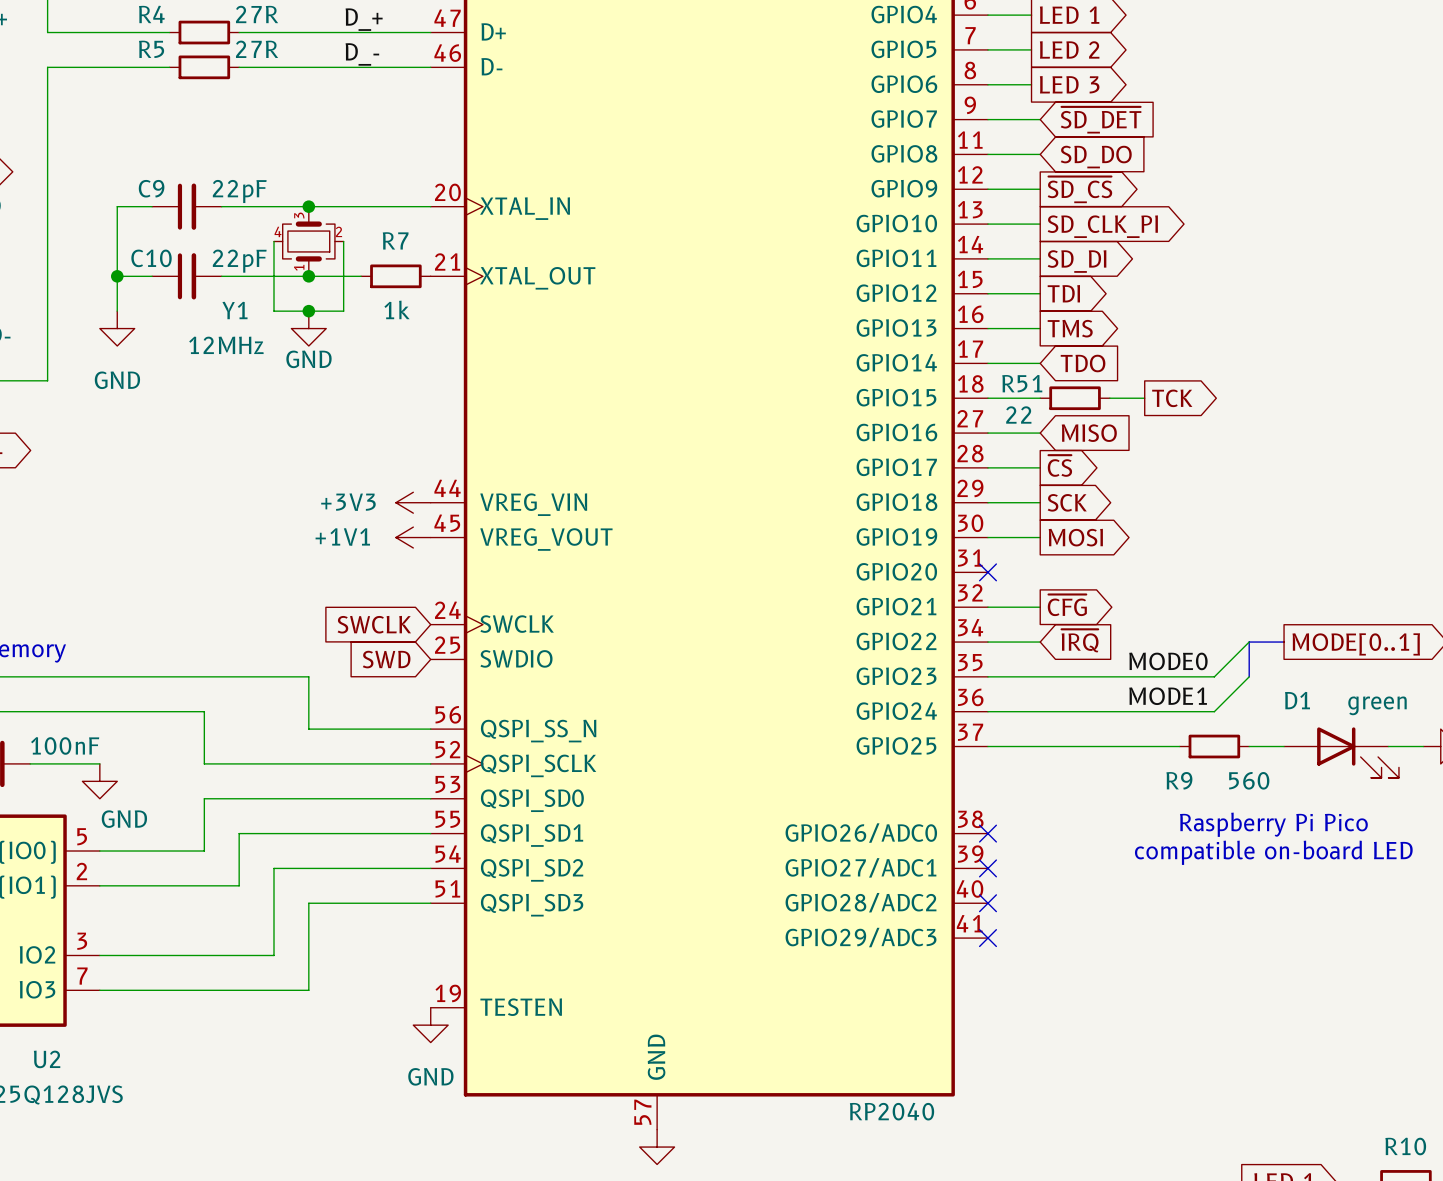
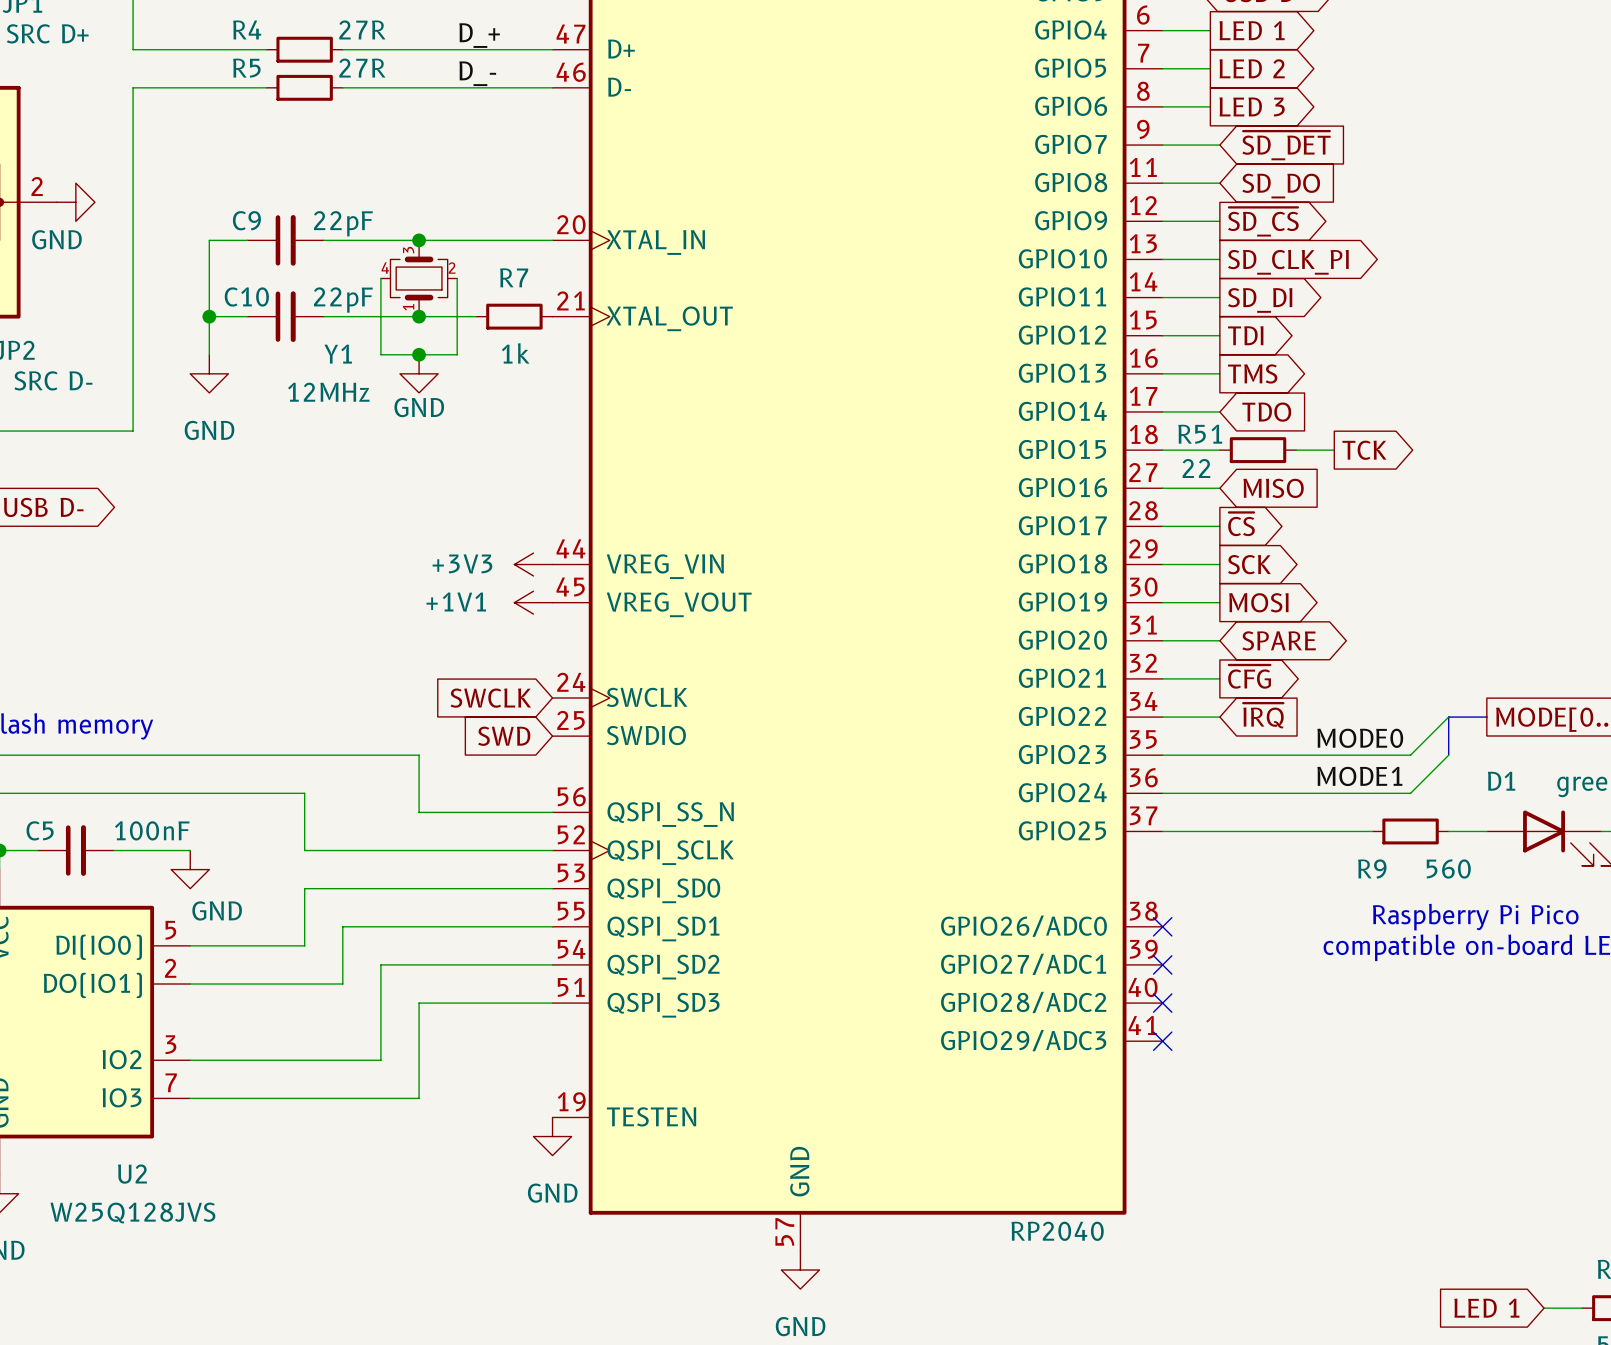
wire: none -> (1162, 640) (1219, 640)
no-connect mark: (987, 572) -> none
global label: none -> SPARE (1279, 640)

